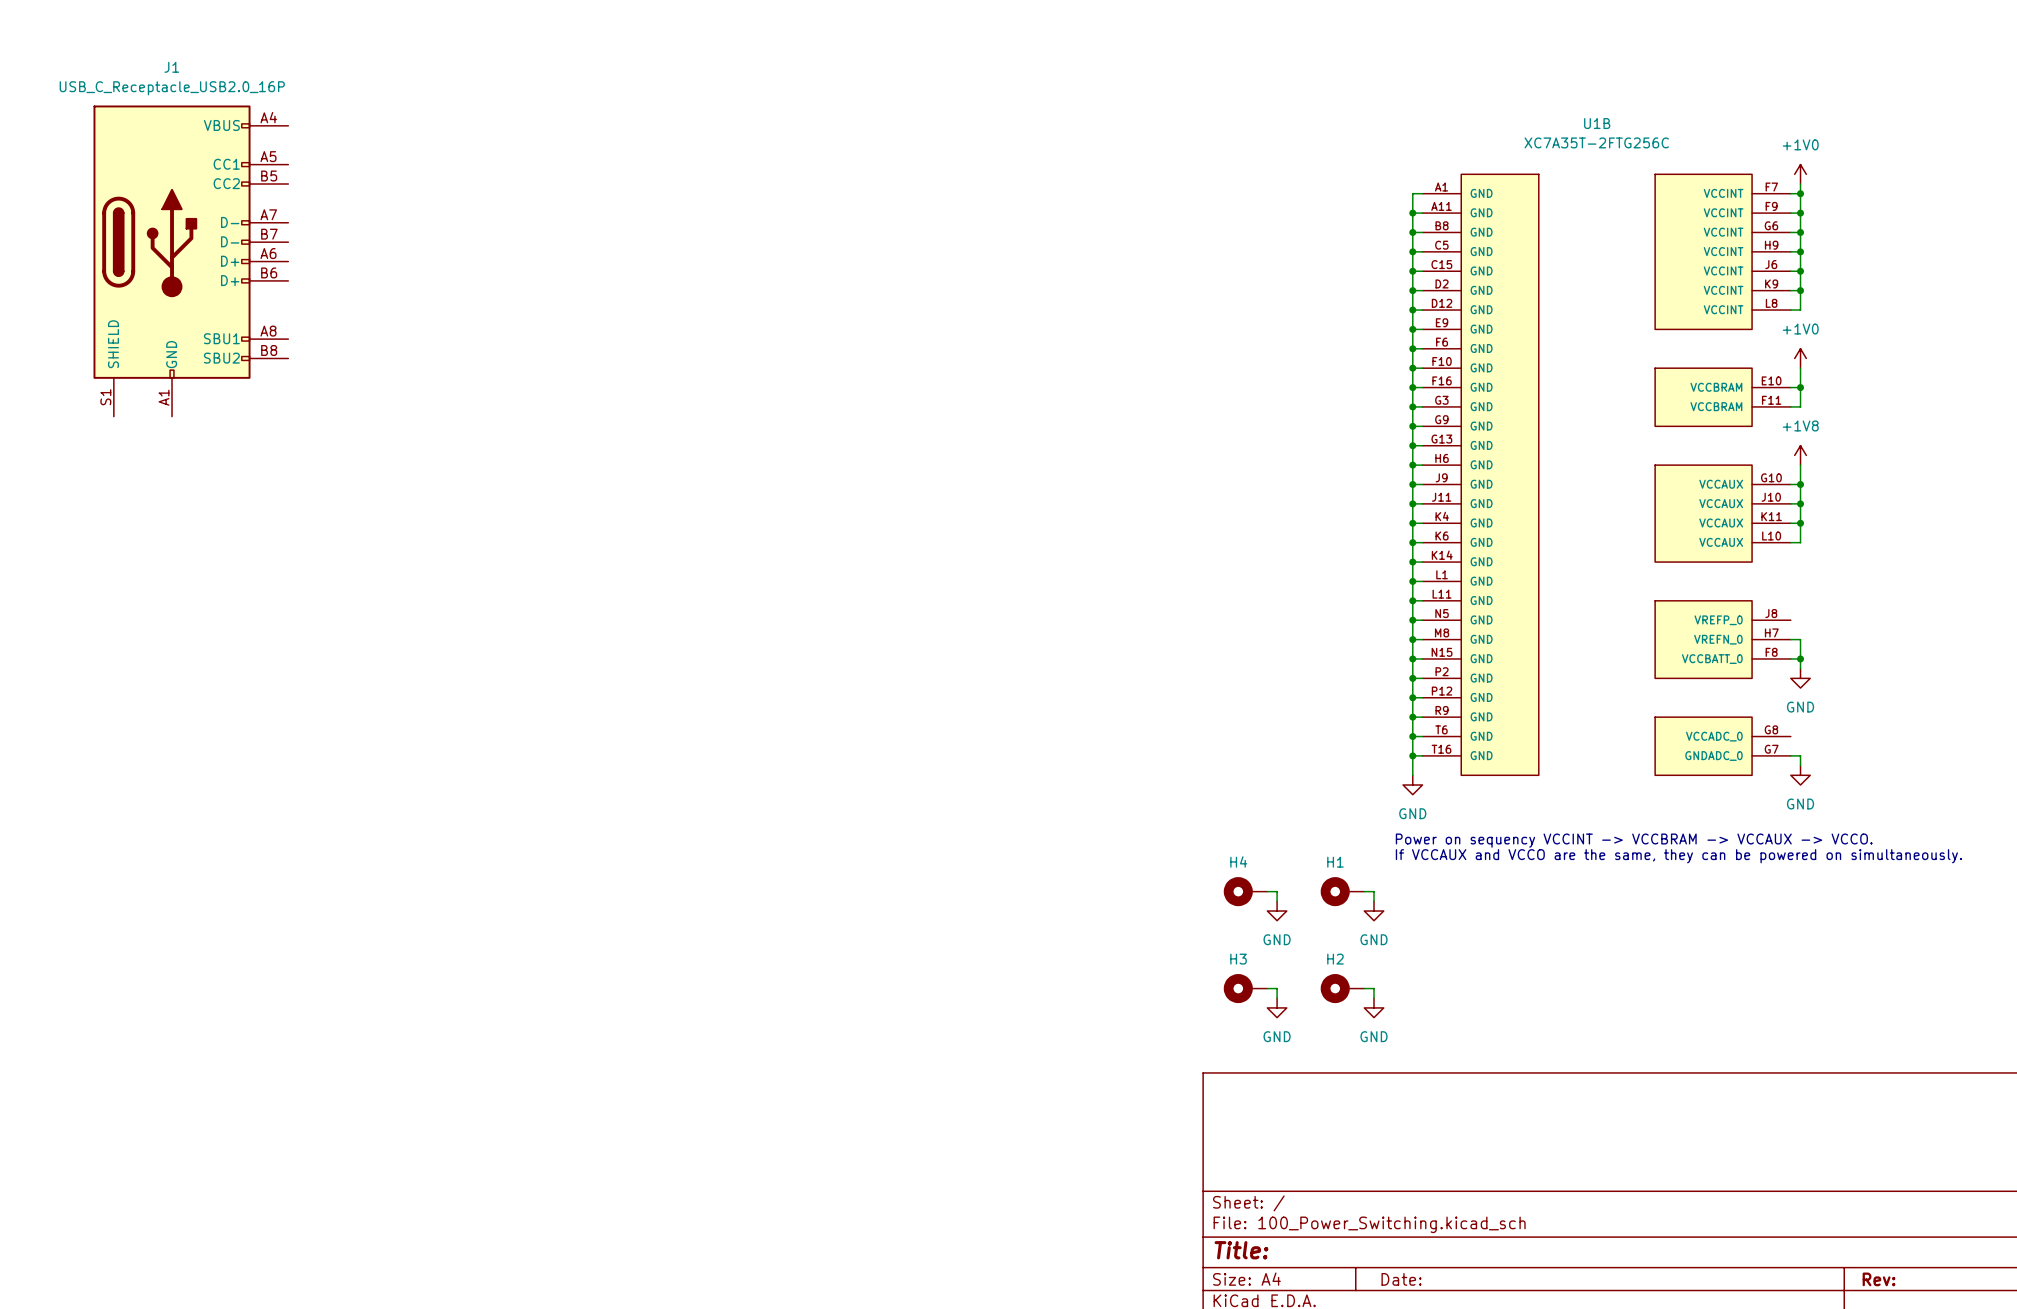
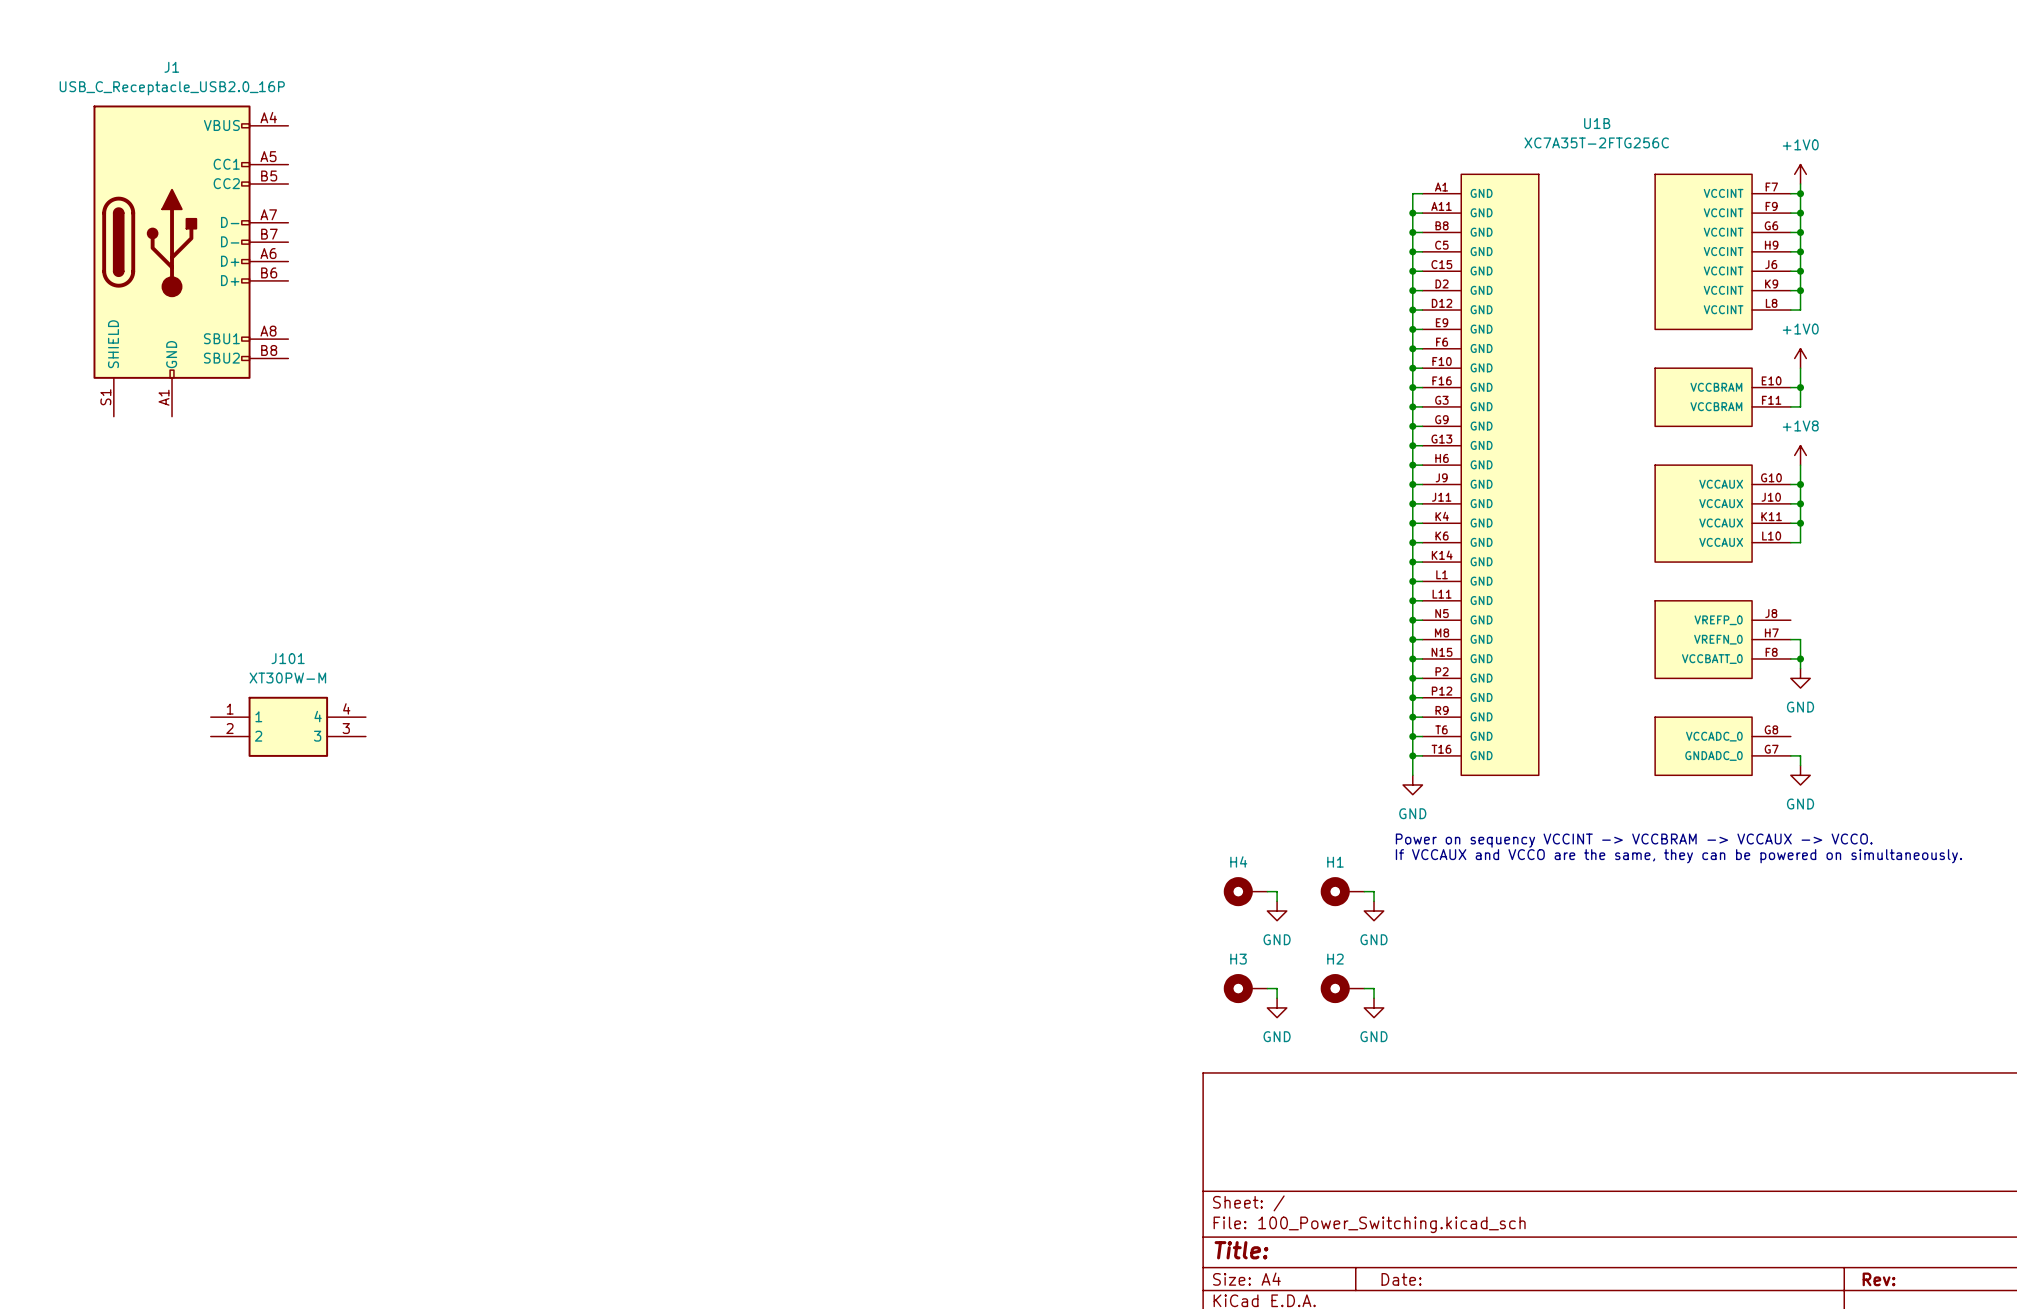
J101: none -> XT30PW-M (288, 726)

